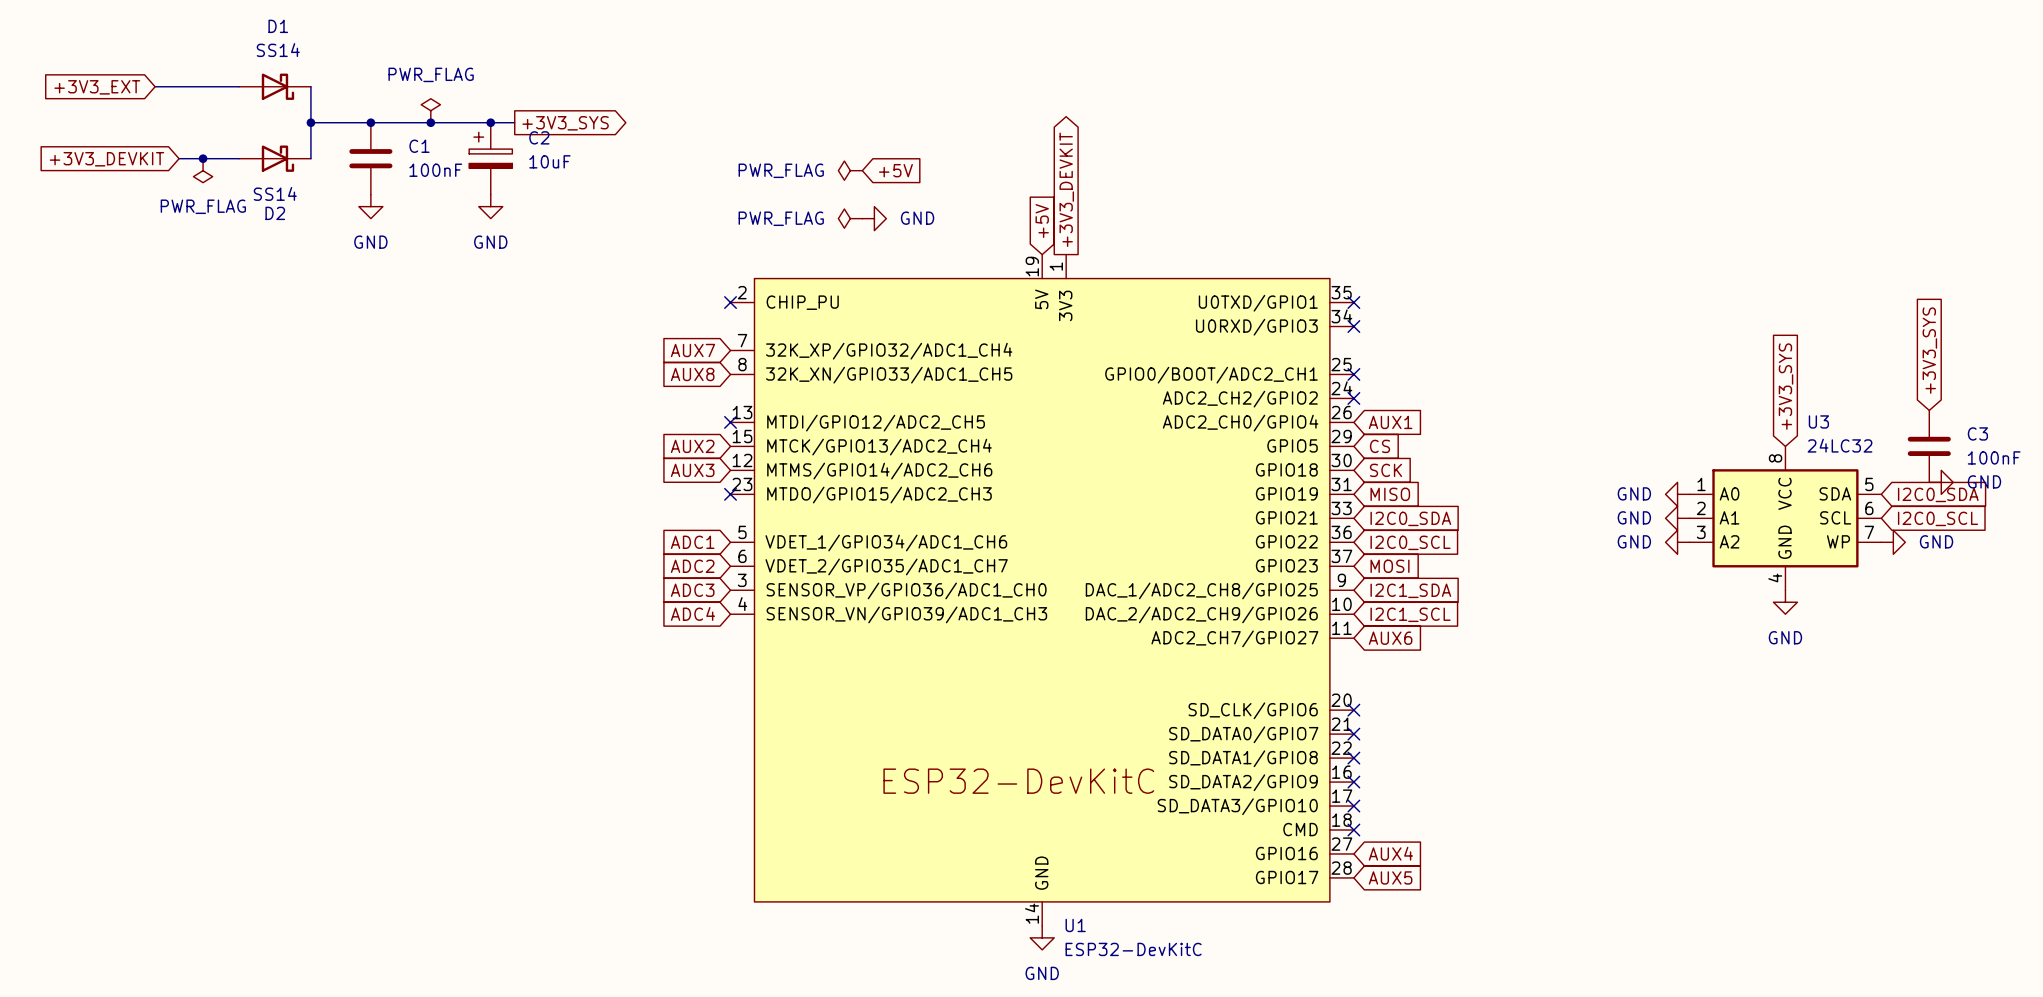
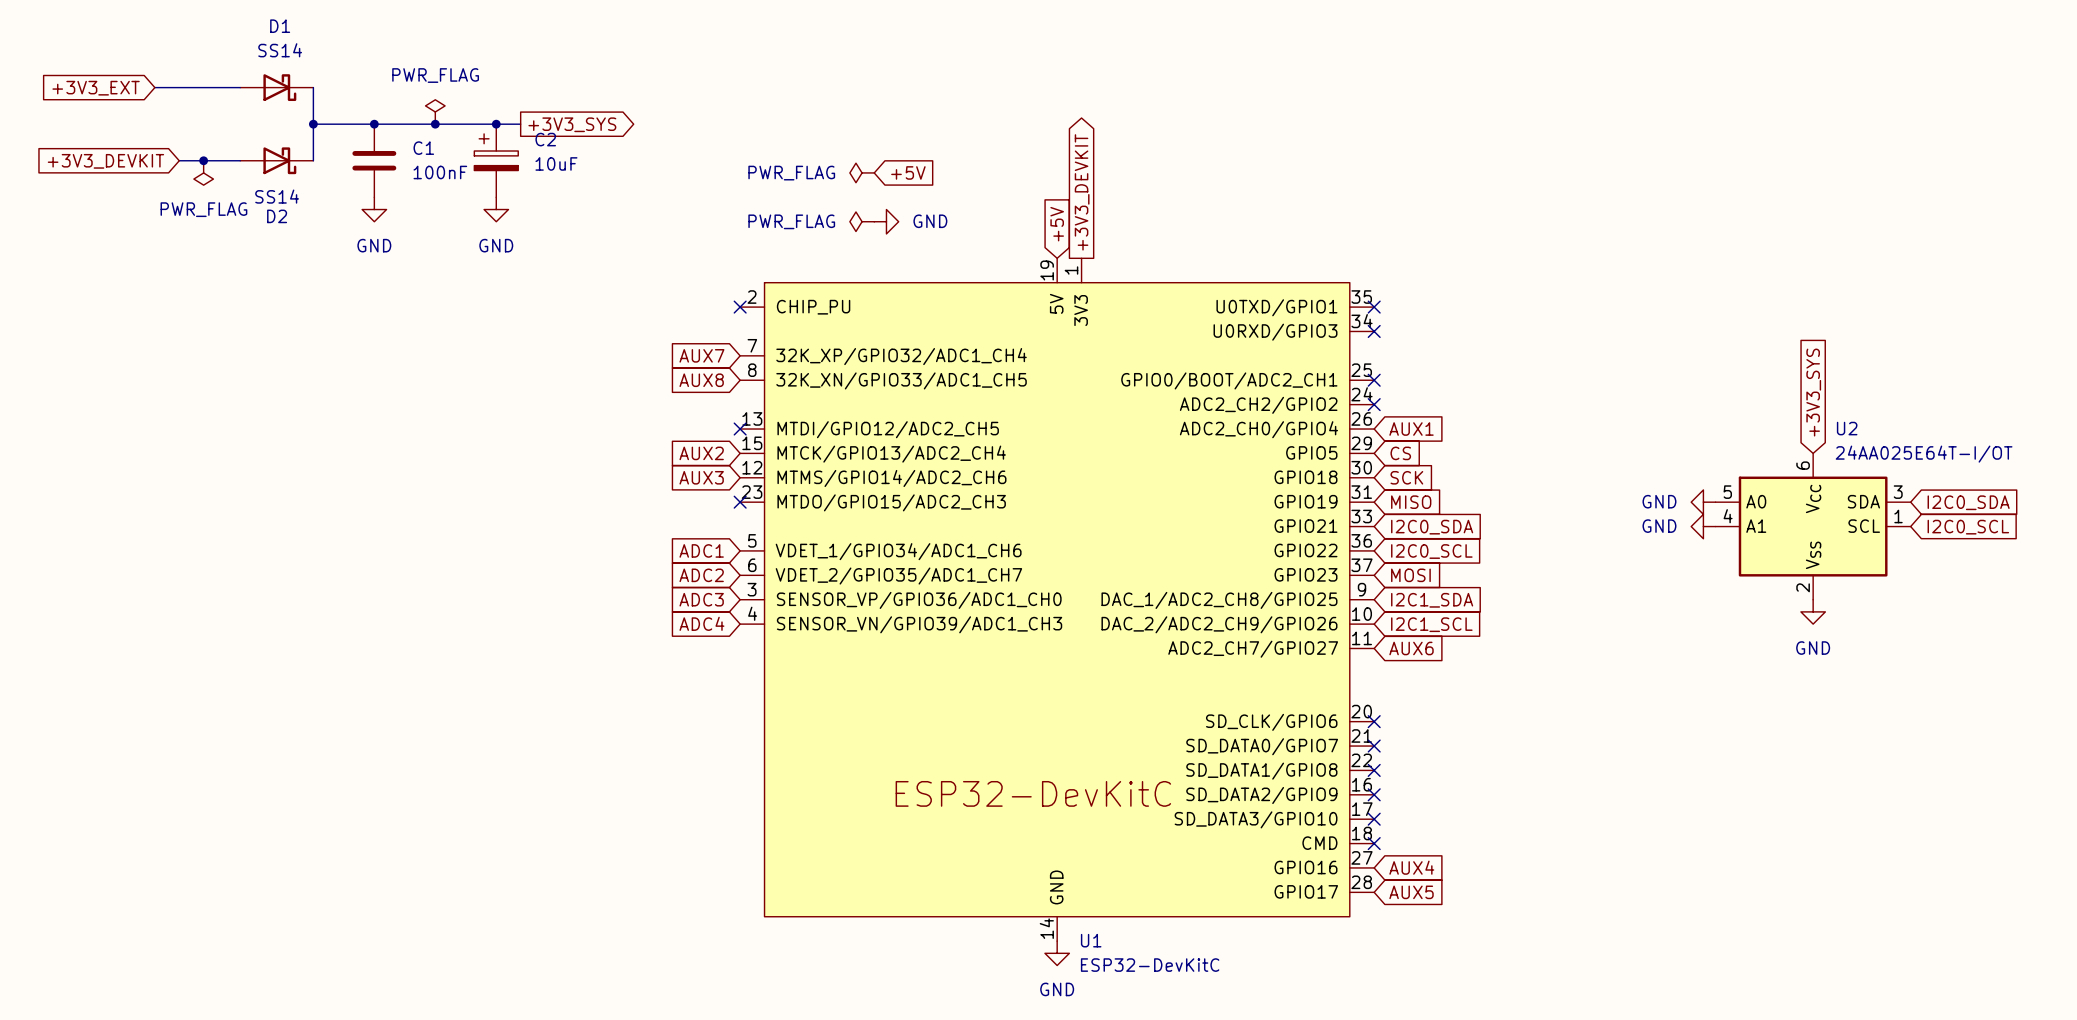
global label: +3V3_SYS (1929, 350) -> none
C3: 100nF (1929, 446) -> none
power symbol: GND (1941, 482) -> none
U3: 24LC32 (1785, 518) -> none
U2: none -> 24AA025E64T-I/OT (1813, 526)
power symbol: GND (1677, 542) -> none
power symbol: GND (1893, 542) -> none

